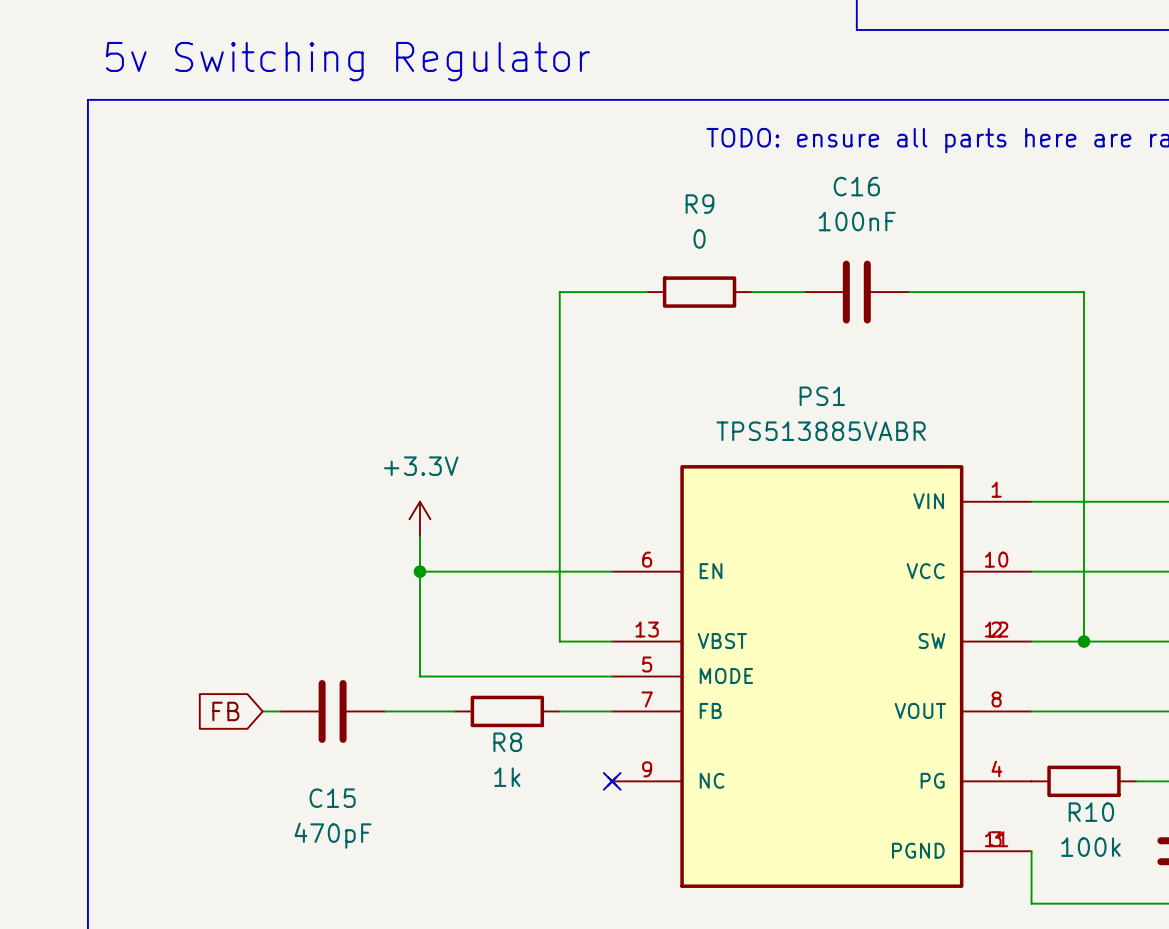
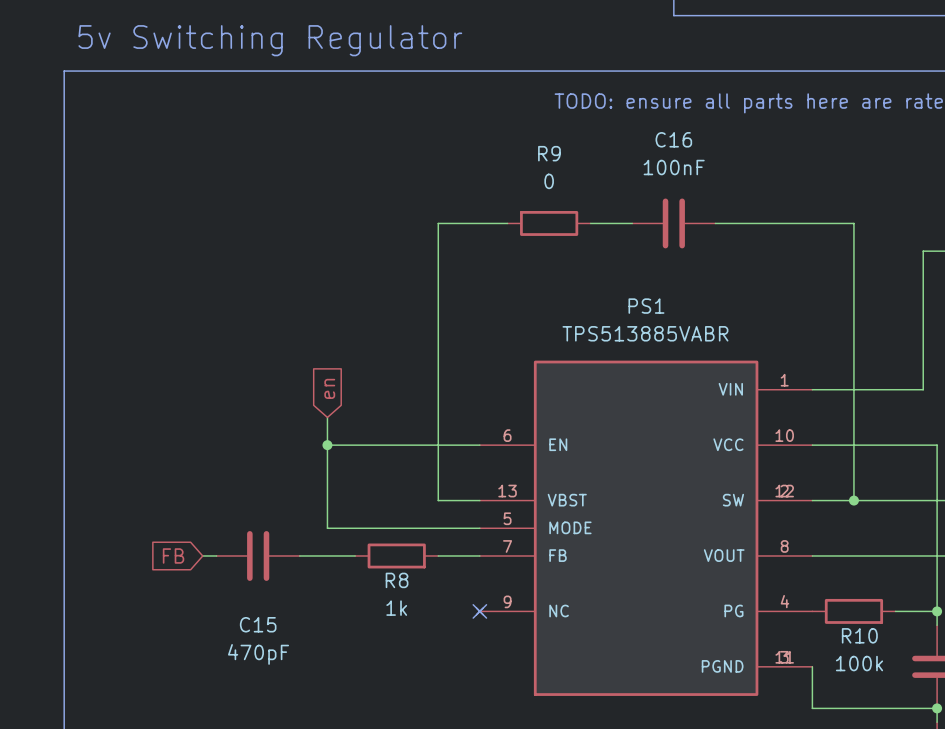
global label: none -> en (329, 388)
power symbol: +3.3V (419, 519) -> none

